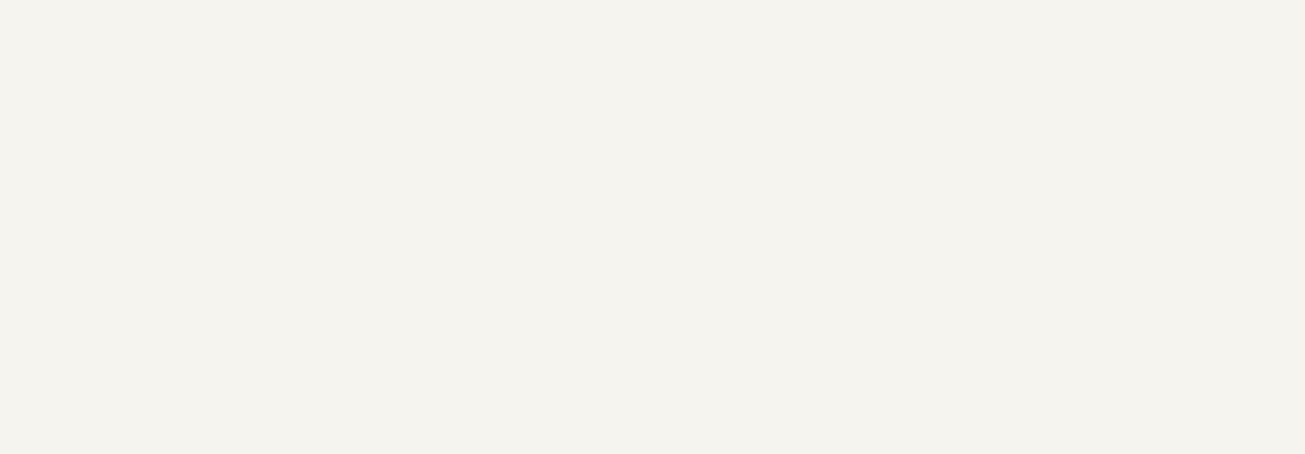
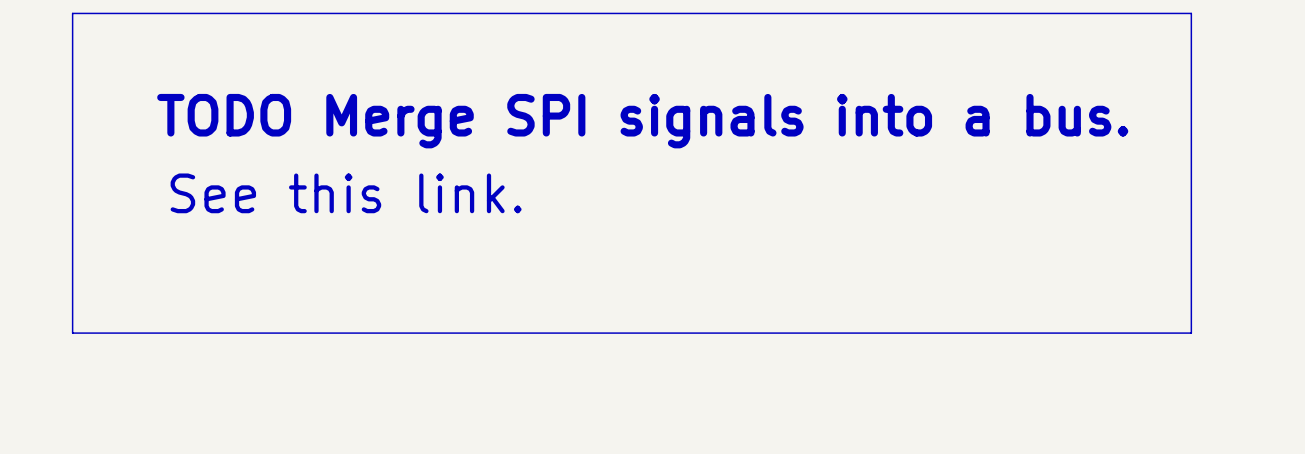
line: none -> (72, 13) (1191, 13) (1191, 333) (72, 333) (72, 13)
text: none -> TODO Merge SPI signals into a bus. (642, 121)
text: none -> See this link. (346, 193)

